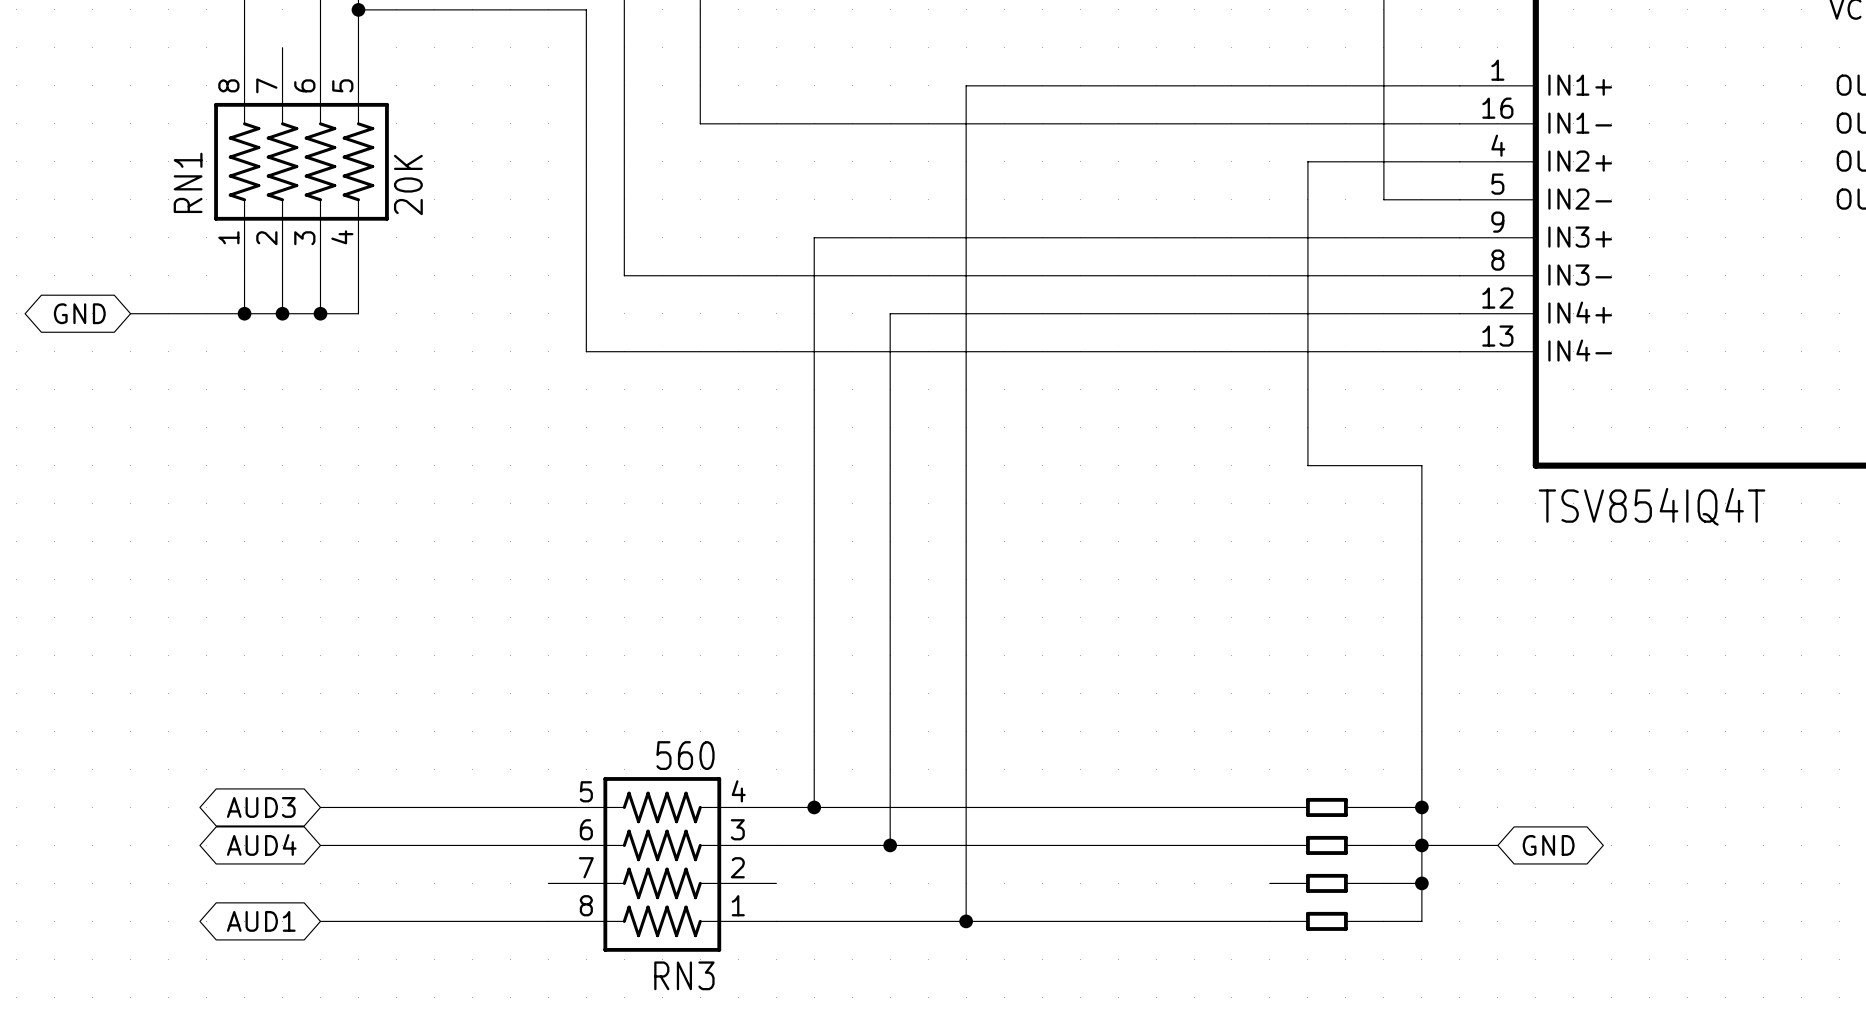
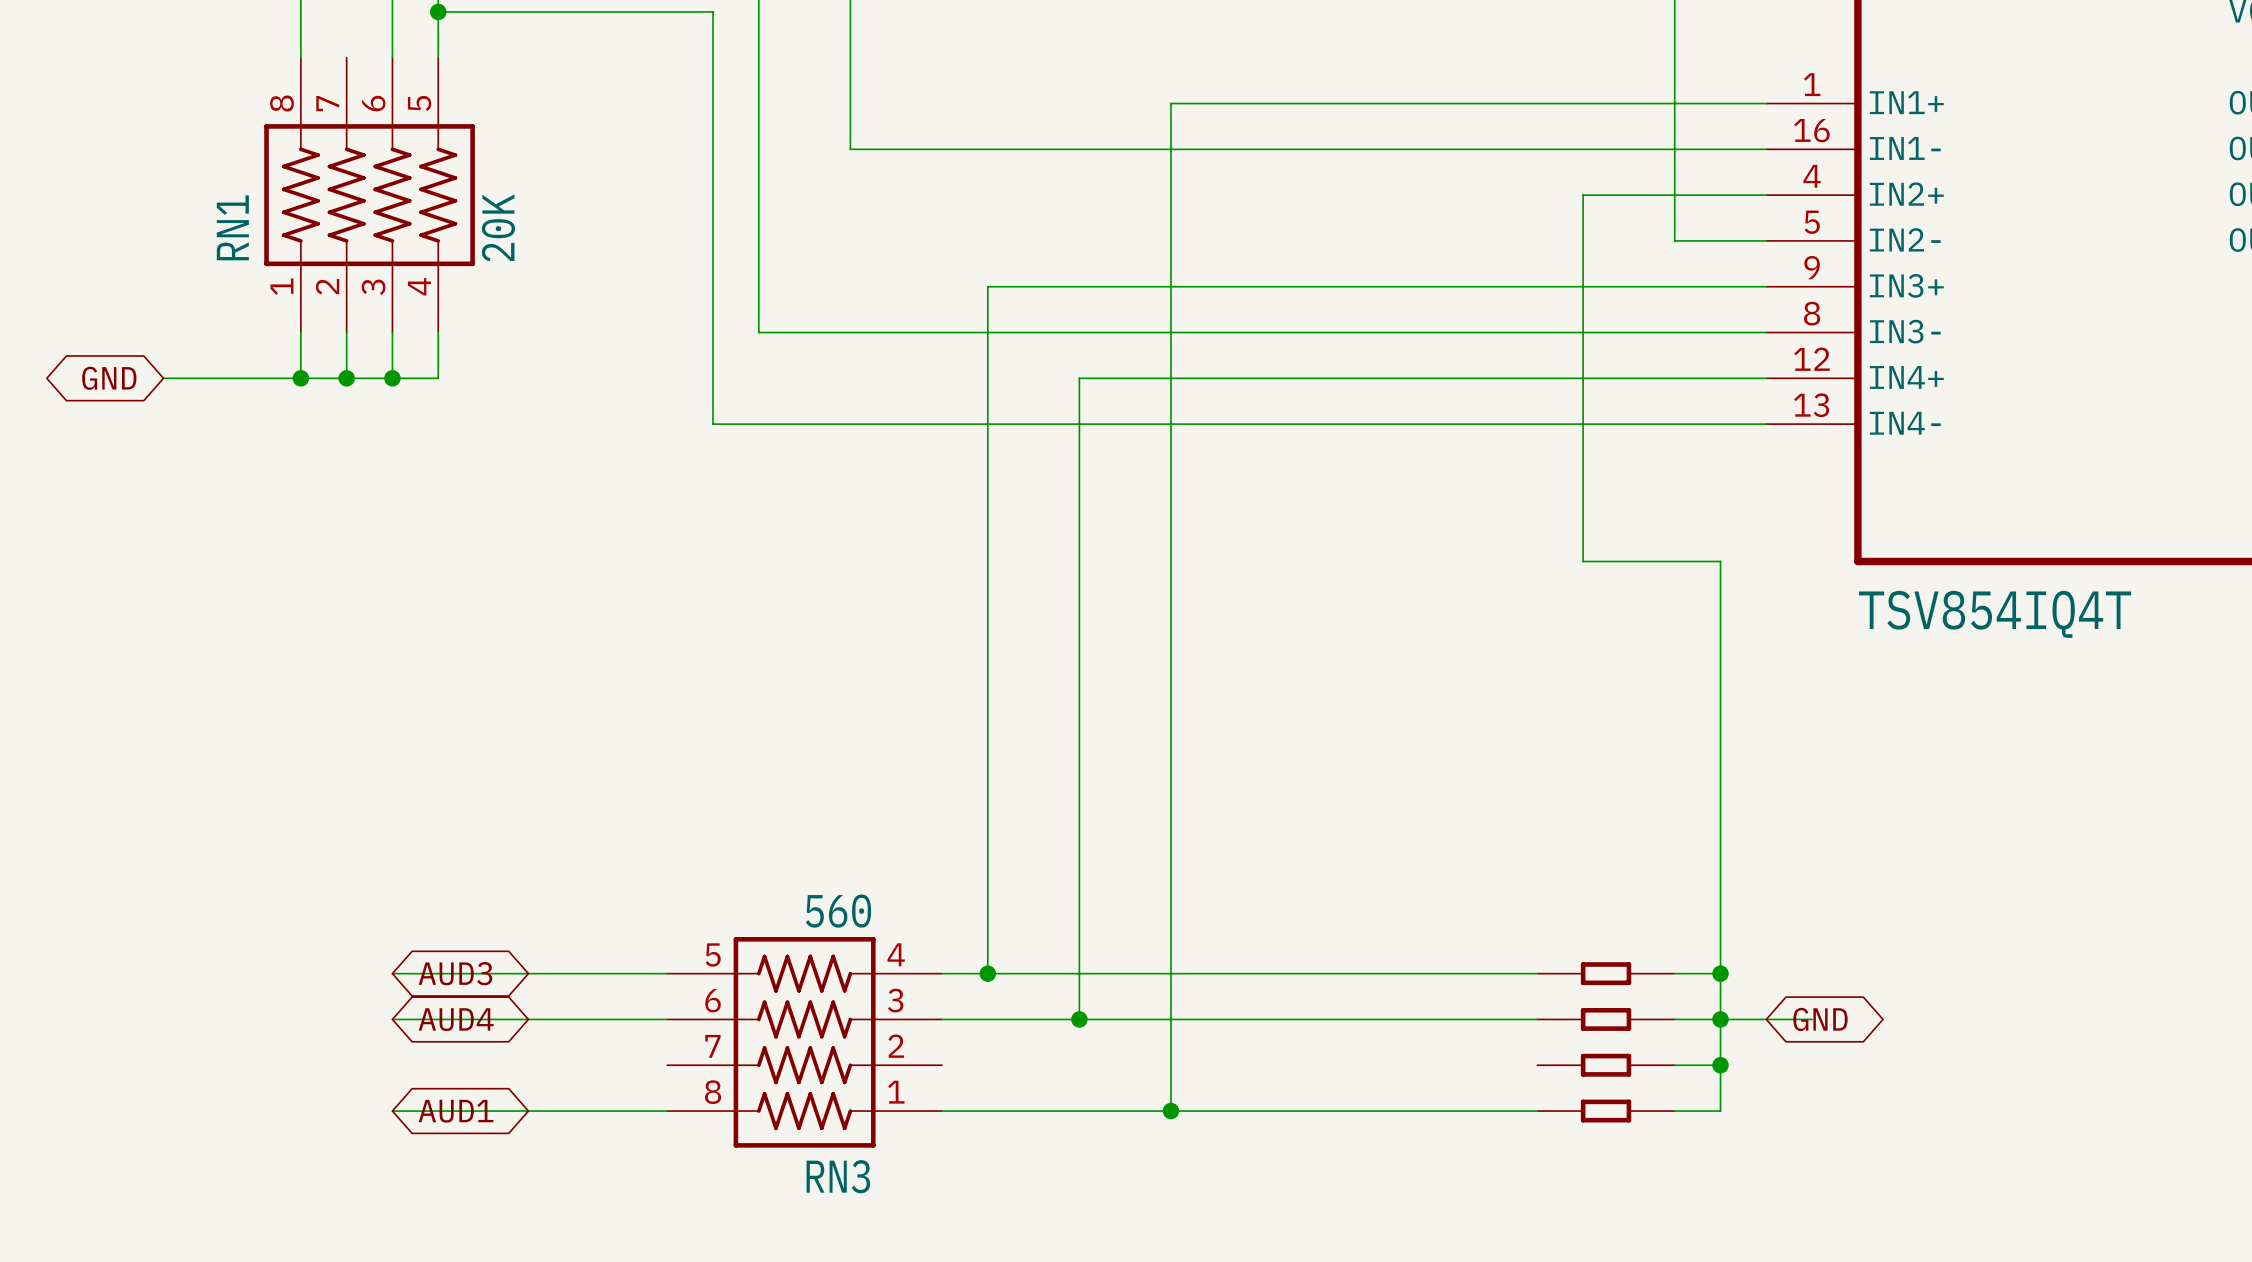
global label rotation: 0° (261, 807) -> 180° (455, 973)
global label rotation: 0° (261, 844) -> 180° (456, 1019)
global label position: GND (1548, 845) -> GND (1820, 1019)
global label rotation: 0° (261, 921) -> 180° (456, 1111)

